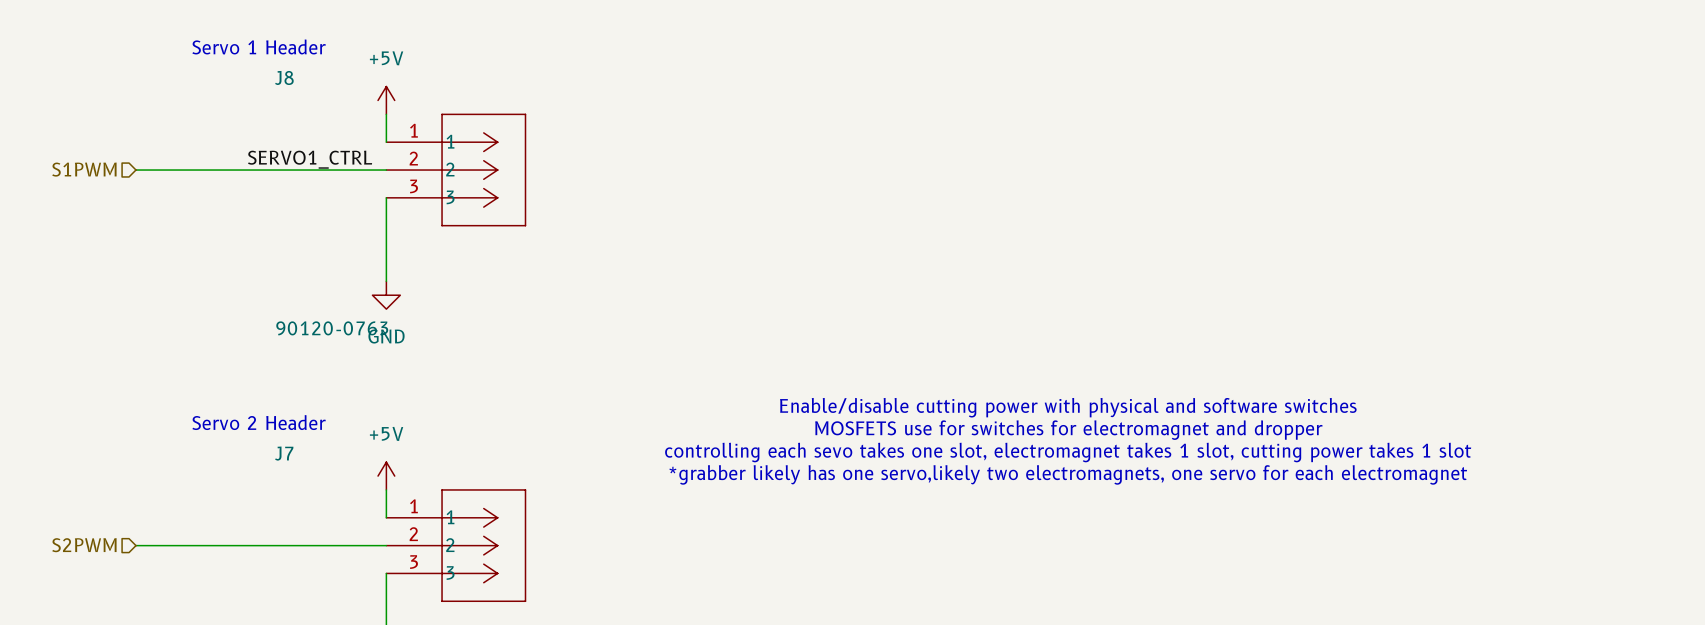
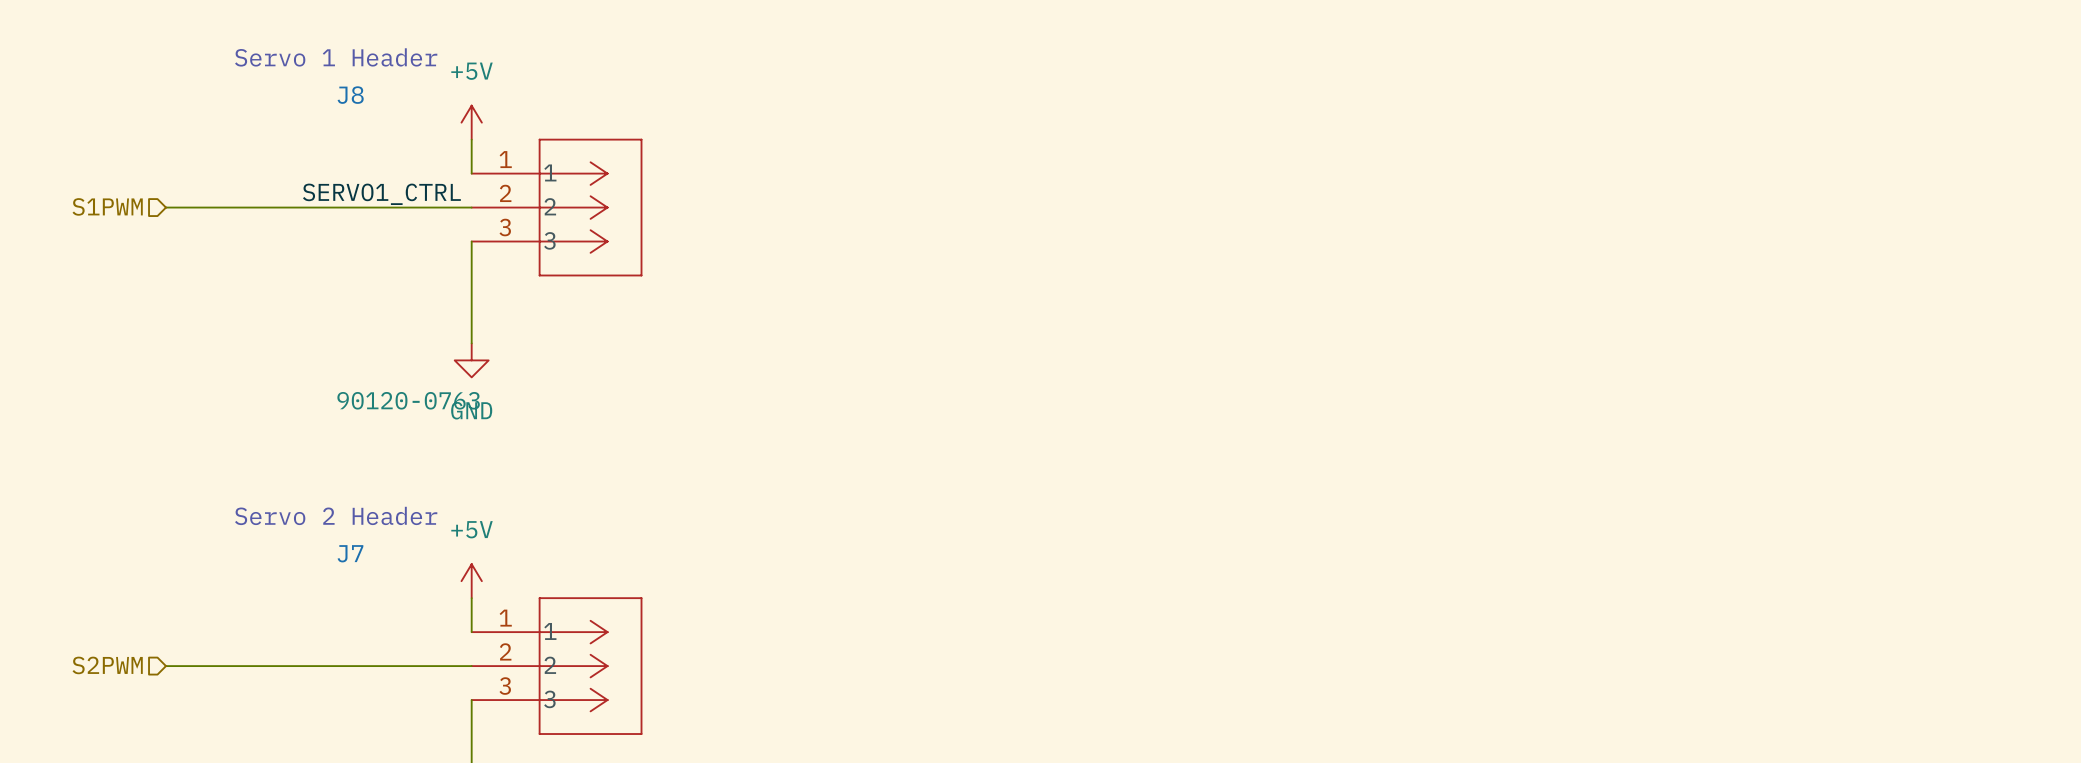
text: Enable/disable cutting power with physical and software switches (1068, 407) -> none
text: MOSFETS use for switches for electromagnet and dropper (1068, 430) -> none
text: controlling each sevo takes one slot, electromagnet takes 1 slot, cutting power takes 1 slot (1068, 452) -> none
text: *grabber likely has one servo,likely two electromagnets, one servo for each electromagnet (1068, 474) -> none

